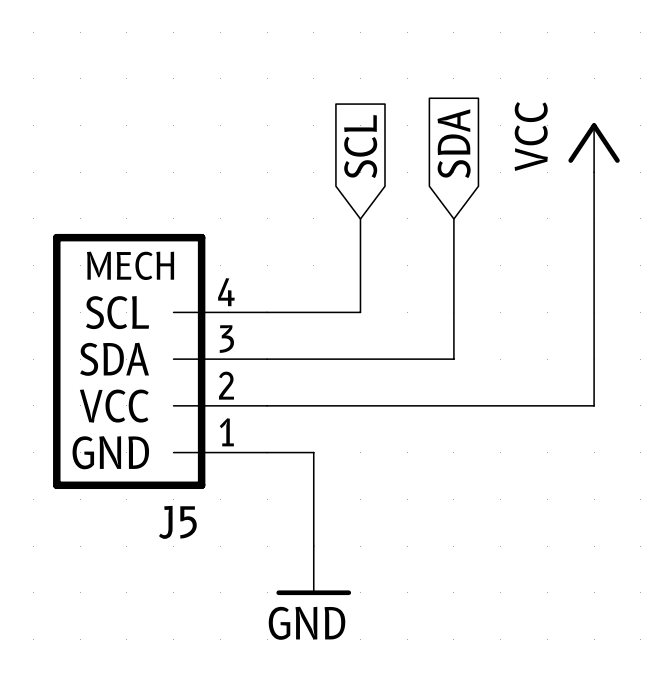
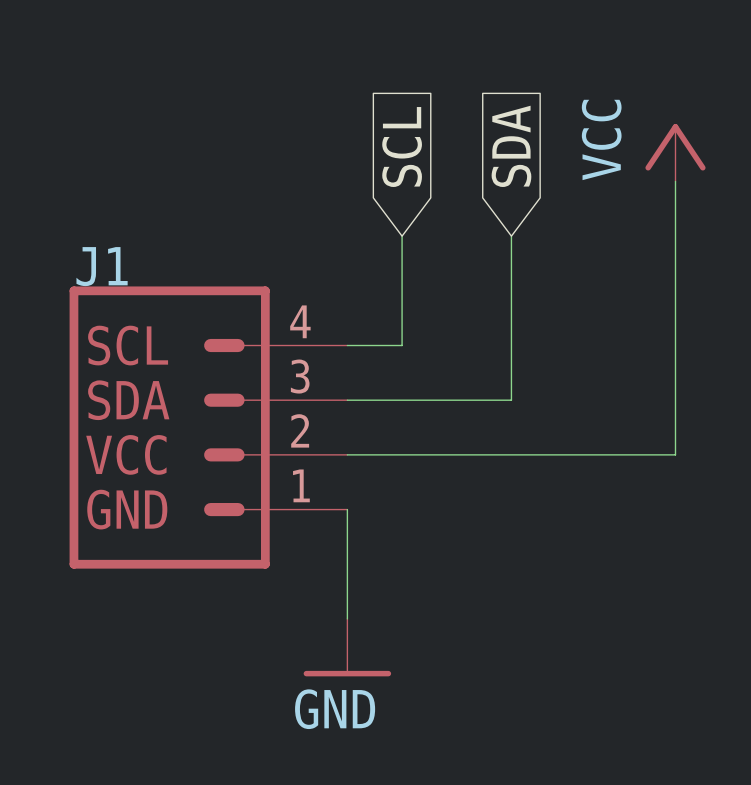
J5: (160, 361) -> none
J1: none -> (208, 427)

